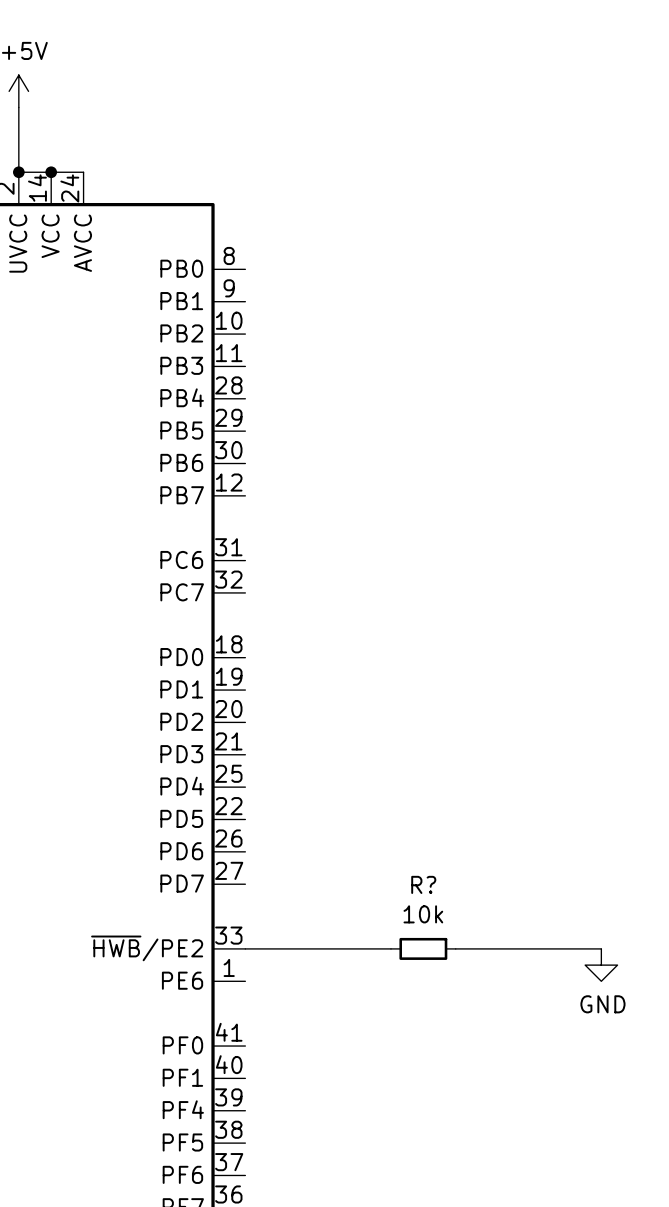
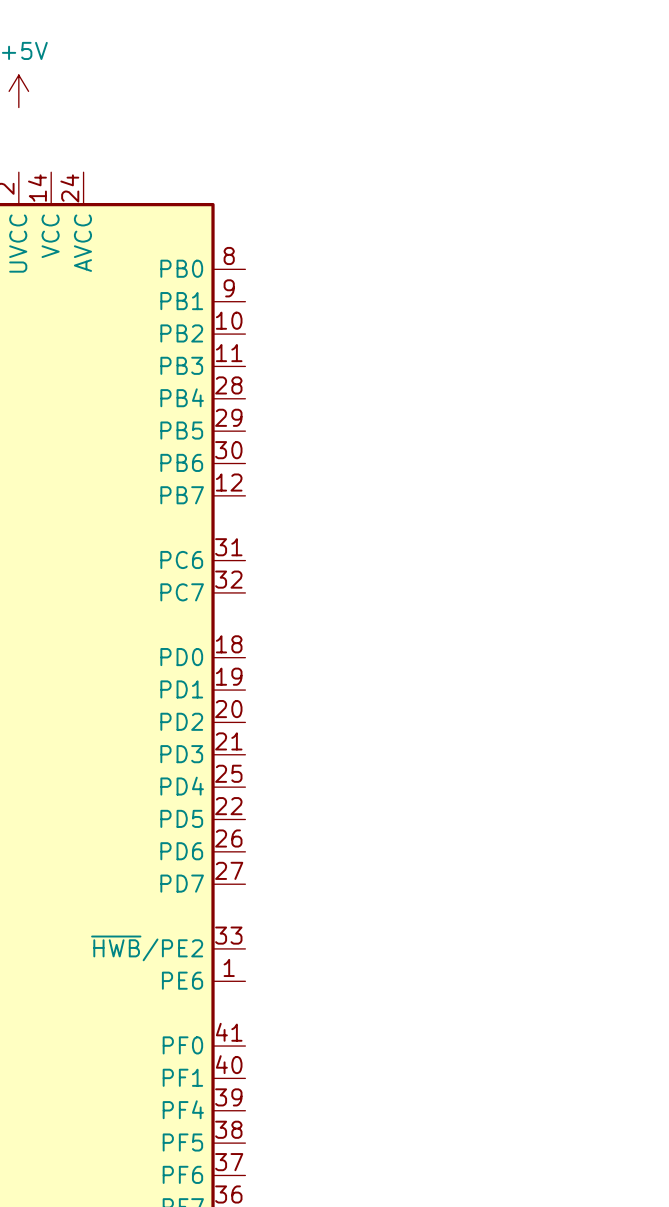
wire: (18, 107) (18, 172) (83, 172) -> none
junction: (18, 172) -> none
junction: (51, 172) -> none
wire: (245, 948) (391, 948) -> none
R?: 10k (423, 948) -> none
wire: (455, 948) (601, 948) -> none
power symbol: GND (601, 965) -> none

